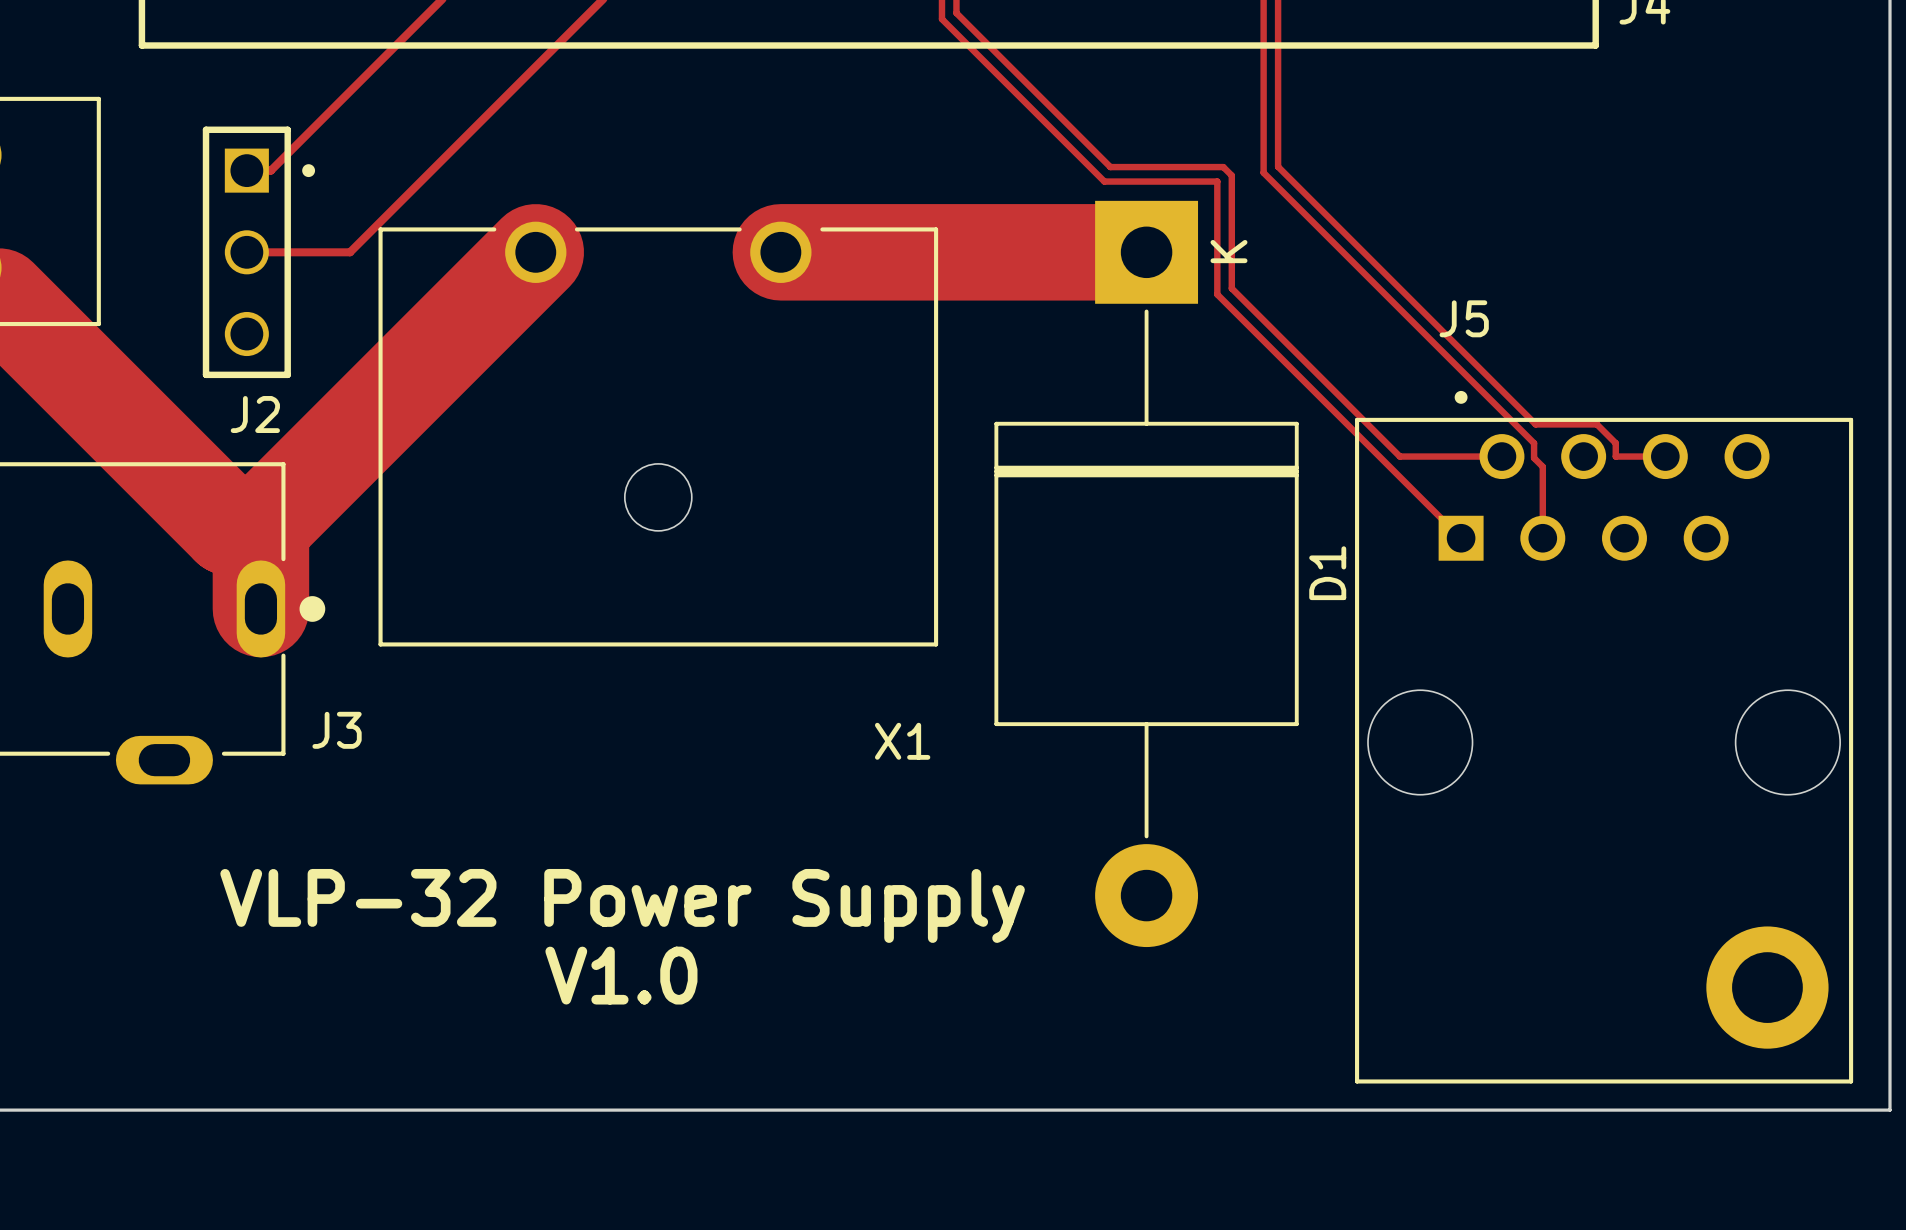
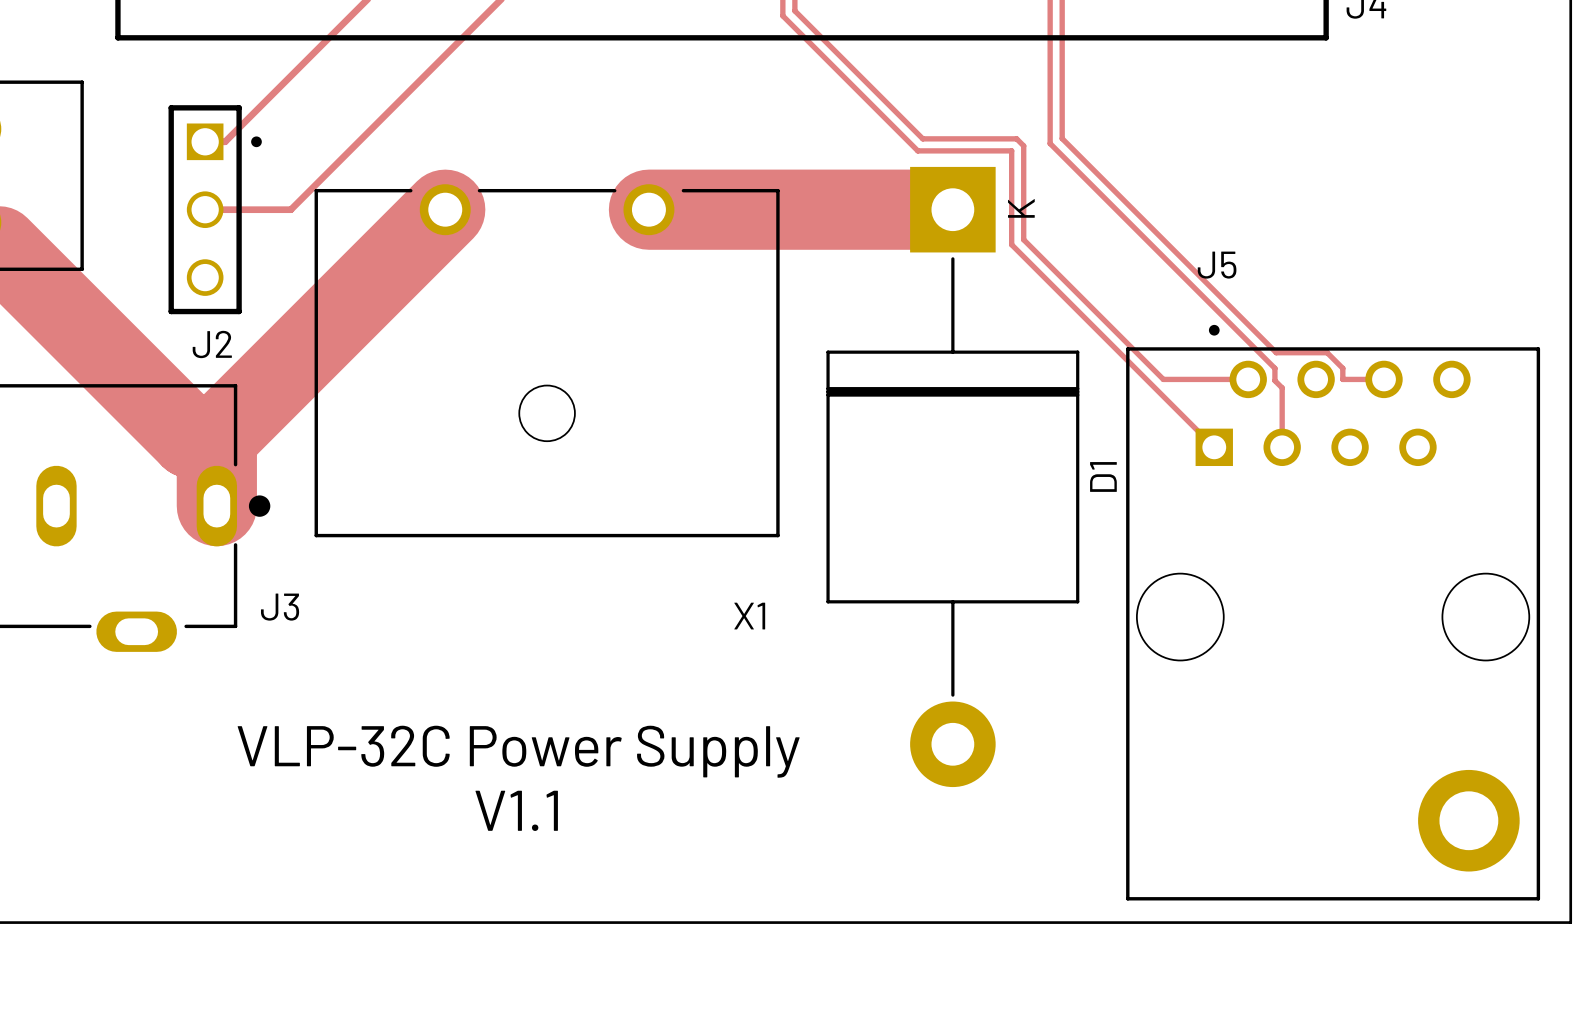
text: VLP-32 Power Supply (622, 905) -> VLP-32C Power Supply (518, 751)
text: V1.0 (621, 975) -> V1.1 (516, 810)

